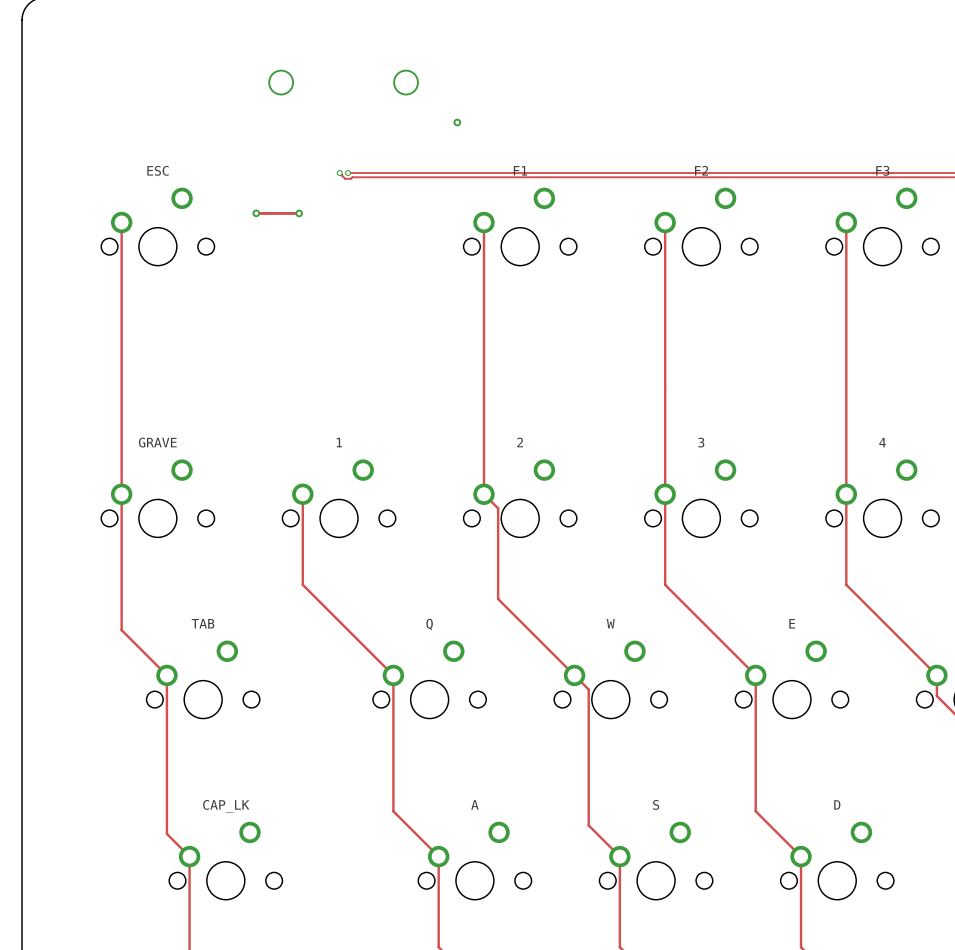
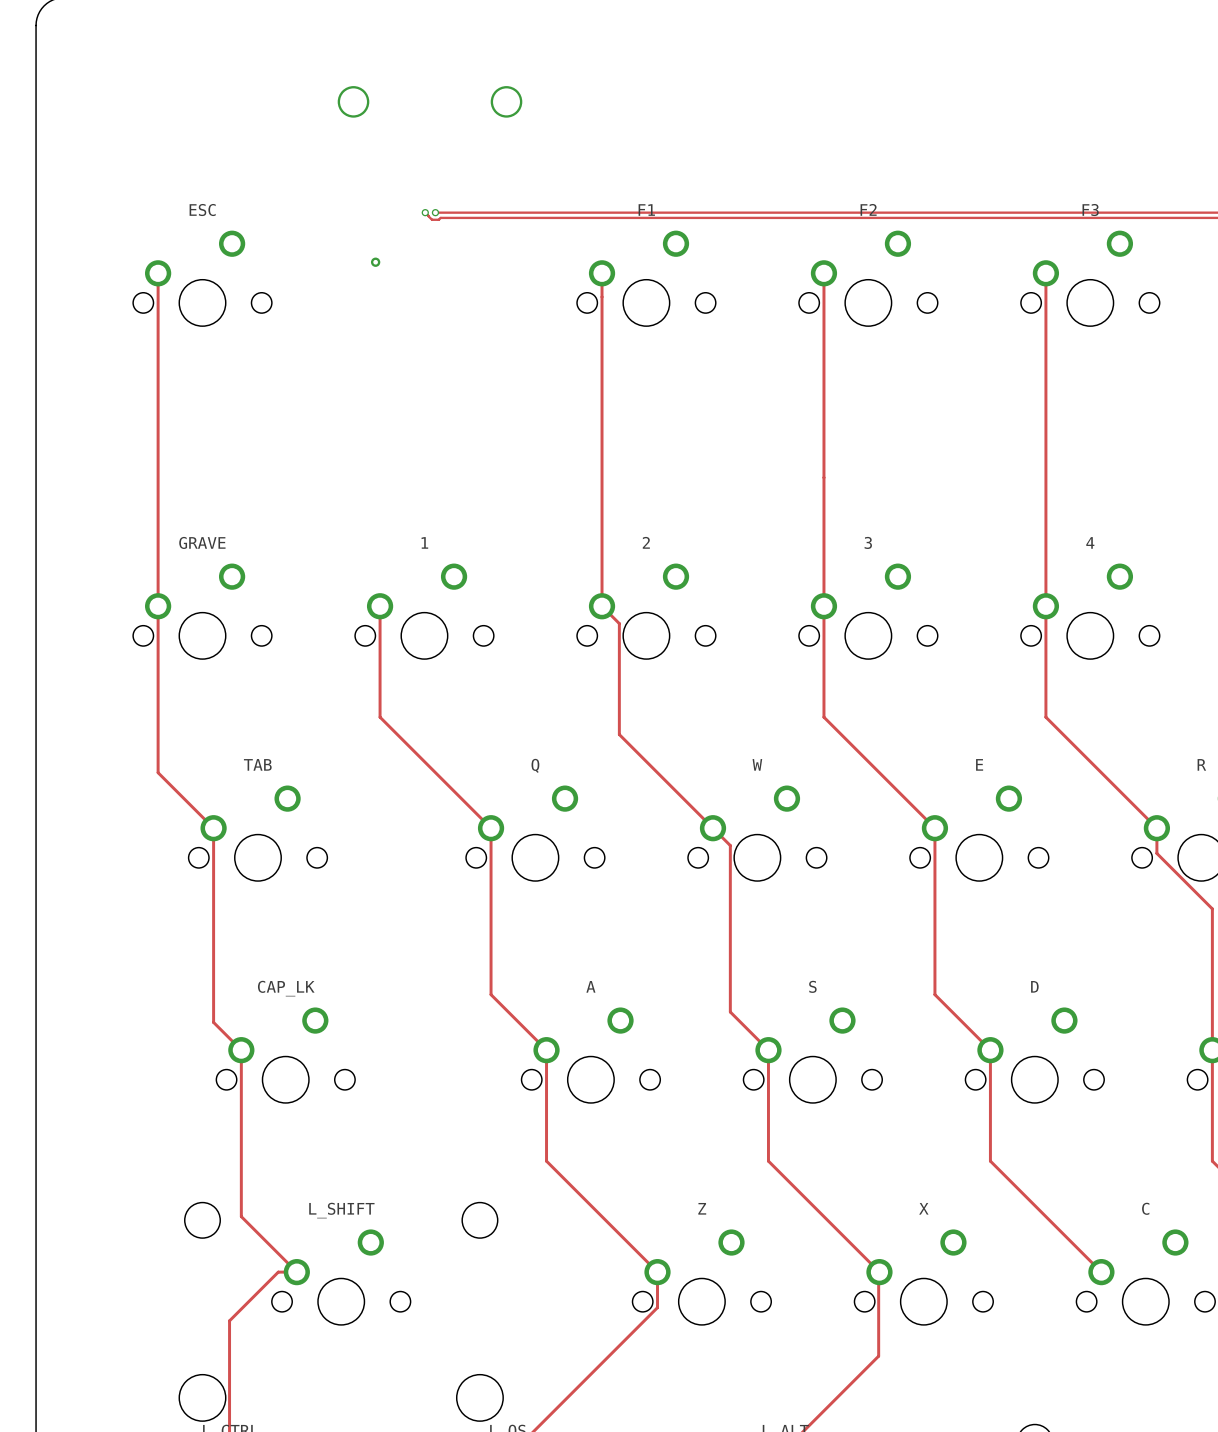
via: (457, 122) -> none
track: (256, 213) (299, 213) -> none
via: (256, 213) -> none

